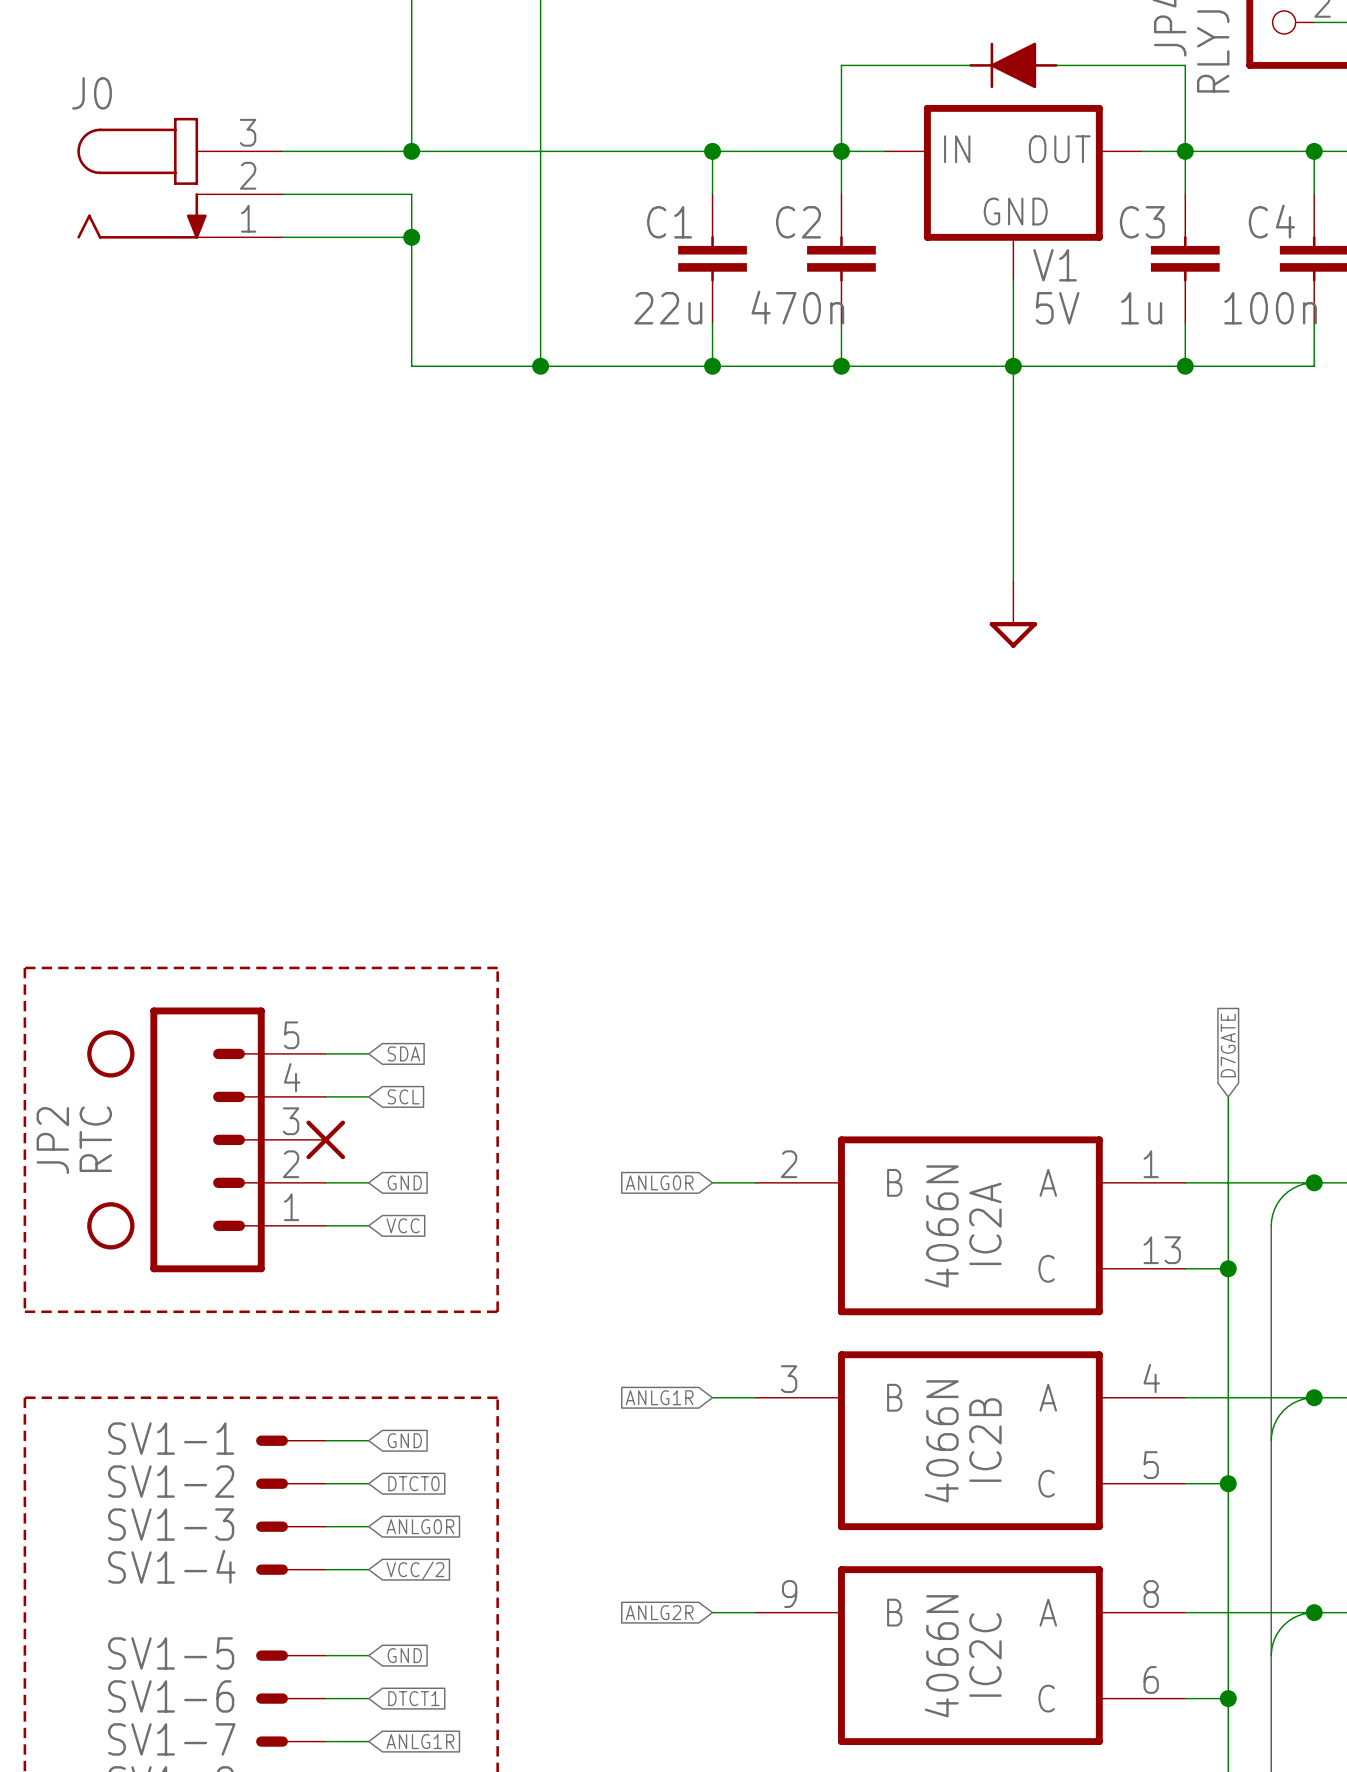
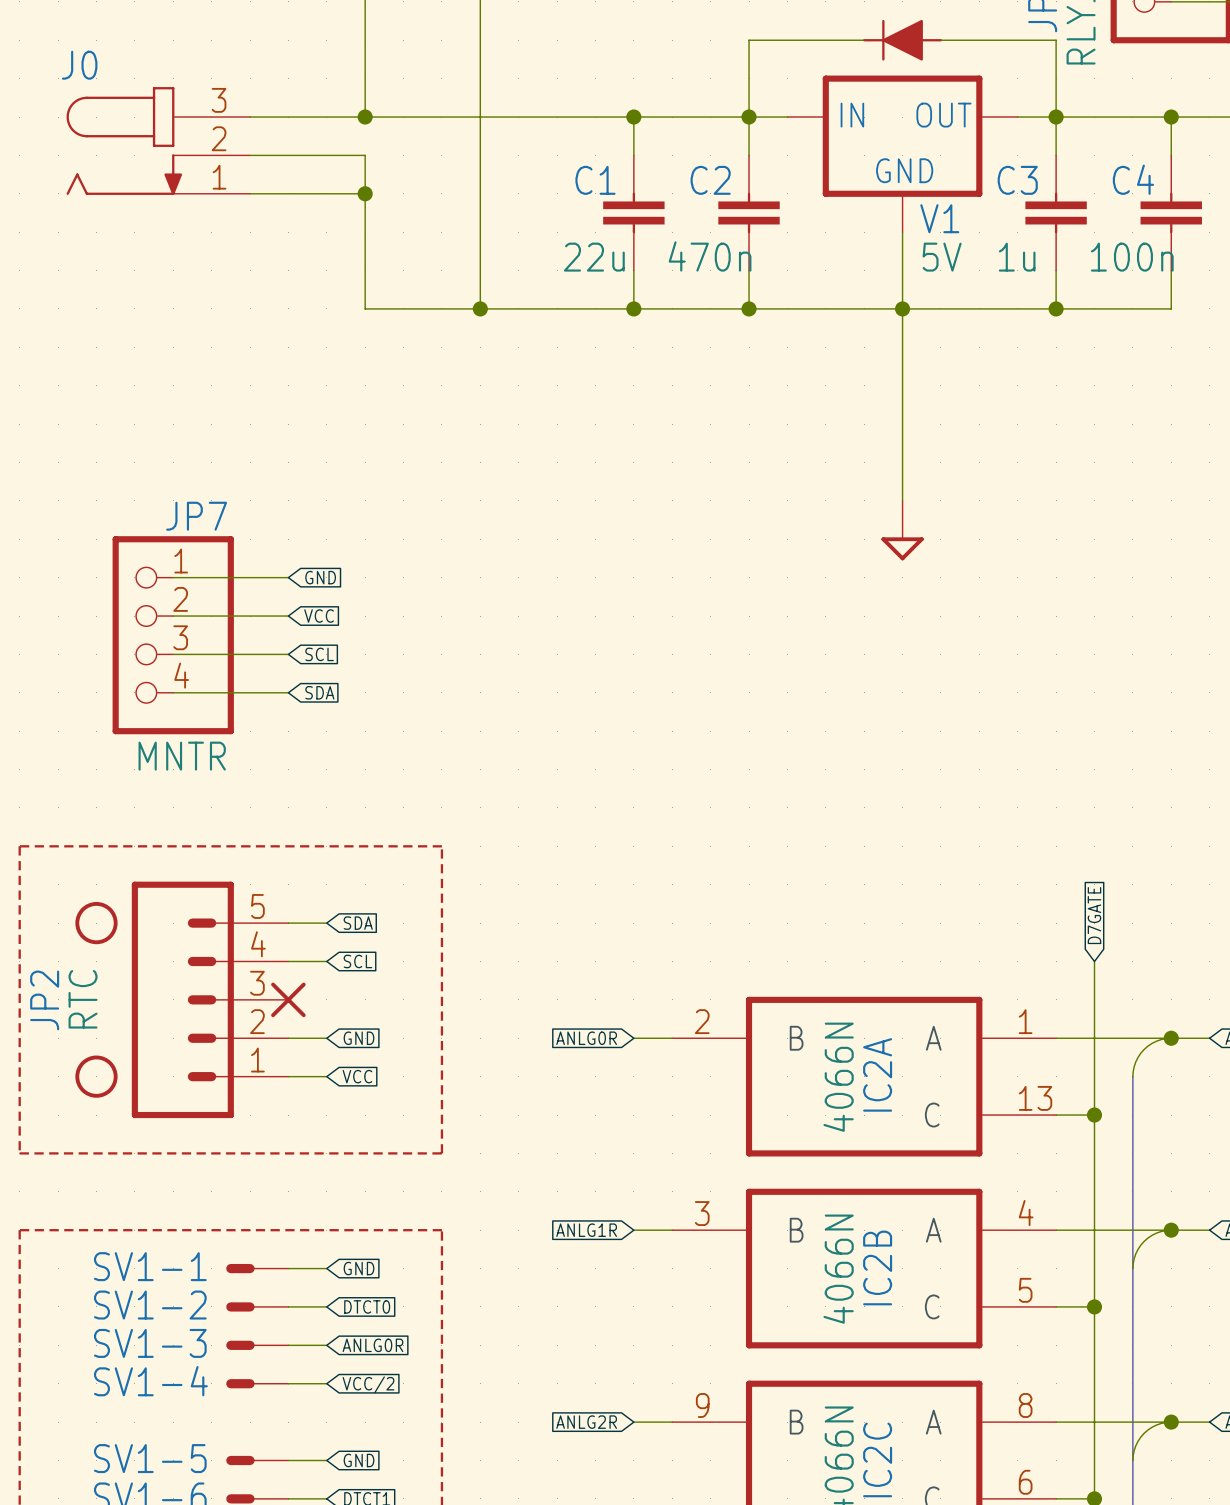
wire: none -> (173, 577) (288, 577)
global label: none -> GND (320, 577)
wire: none -> (173, 616) (288, 616)
global label: none -> VCC (319, 616)
JP7: none -> MNTR (173, 635)
wire: none -> (173, 654) (288, 654)
global label: none -> SCL (319, 654)
wire: none -> (173, 692) (288, 692)
global label: none -> SDA (319, 692)

